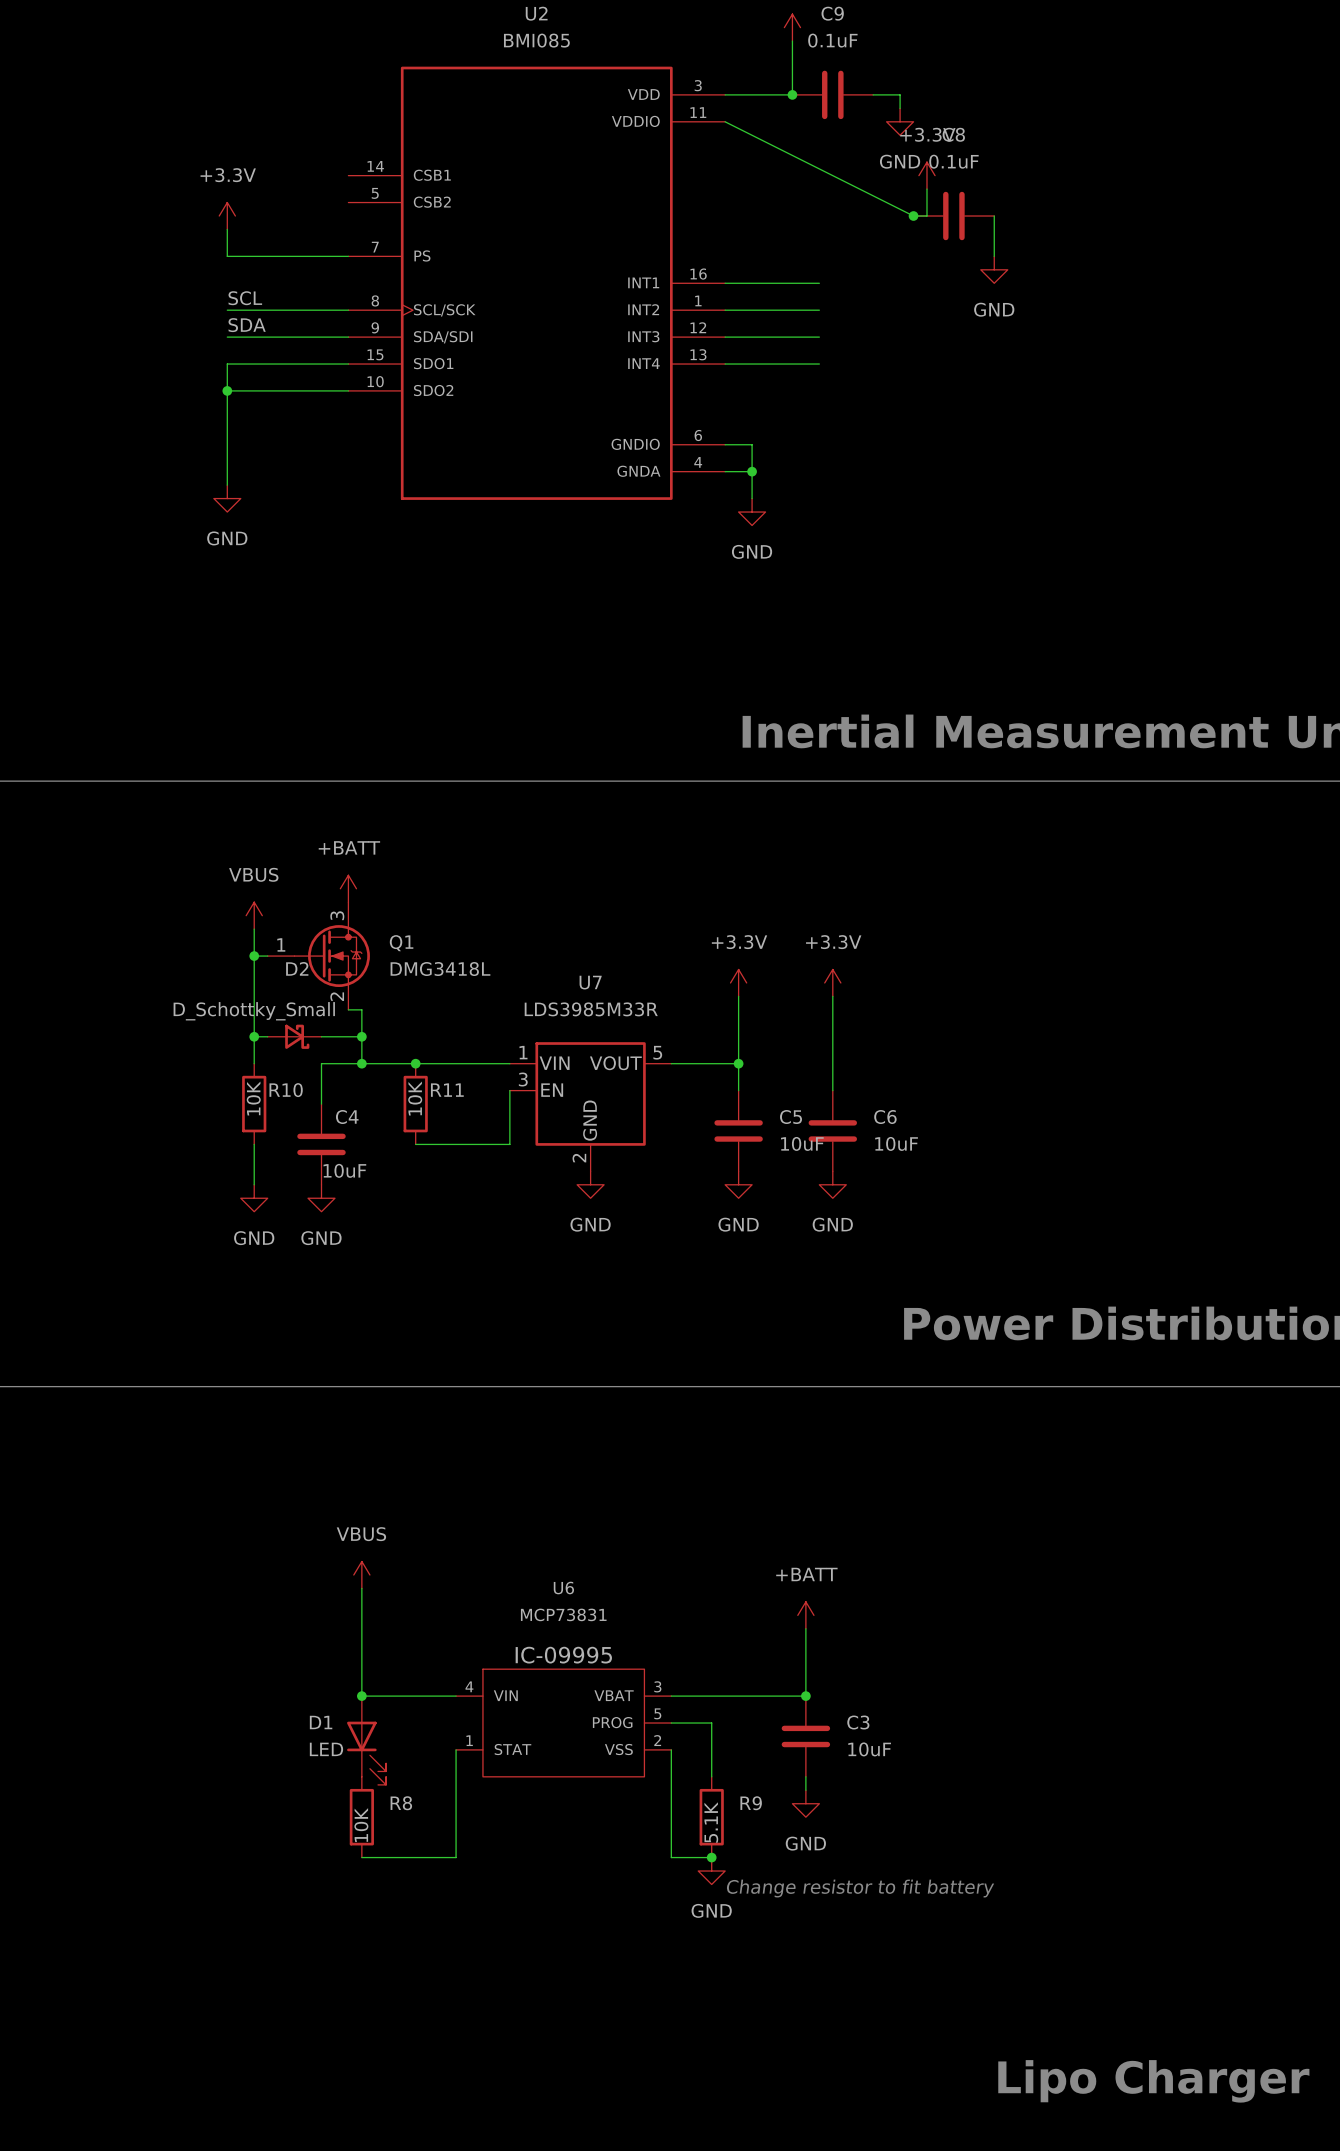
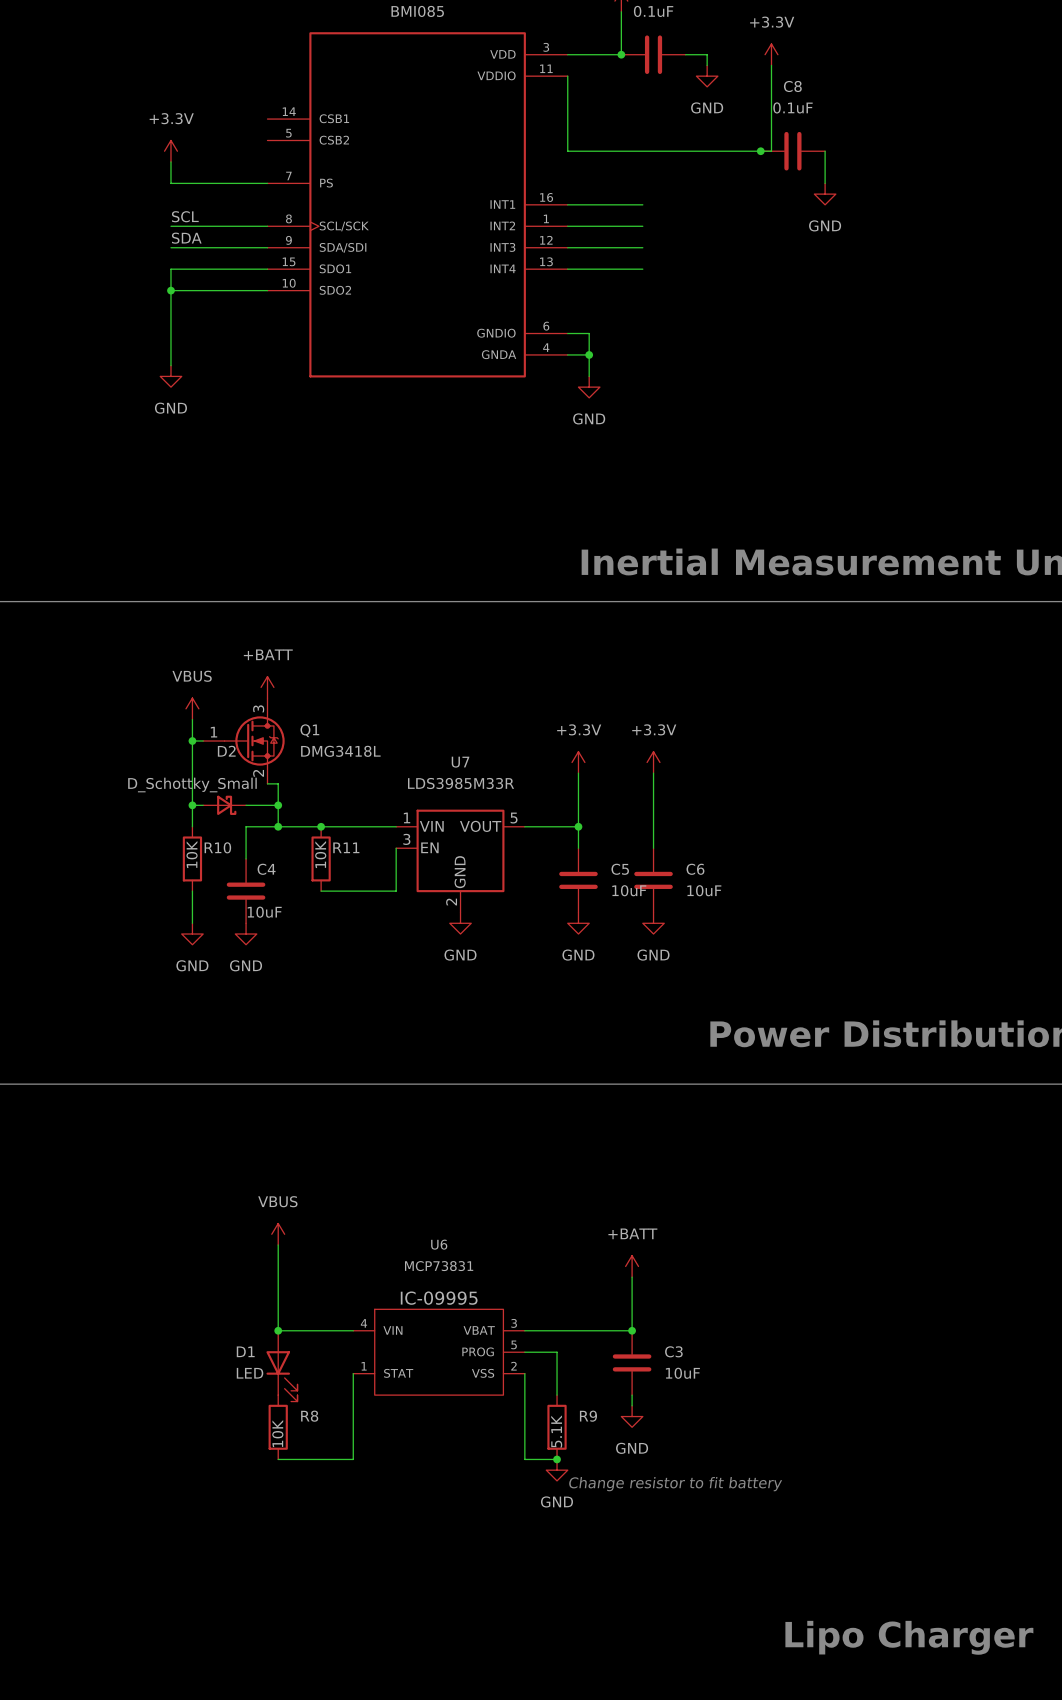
wire: (725, 121) (913, 216) -> (567, 76) (567, 151) (717, 151)
power symbol position: +3.3V (926, 175) -> +3.3V (771, 54)
wire: (926, 189) (926, 216) -> (771, 65) (771, 151) (728, 151)
junction position: (913, 216) -> (760, 151)
C8 position: (953, 216) -> (792, 151)
wire: (994, 216) (994, 256) -> (825, 151) (825, 183)
power symbol position: GND (994, 269) -> GND (825, 194)

